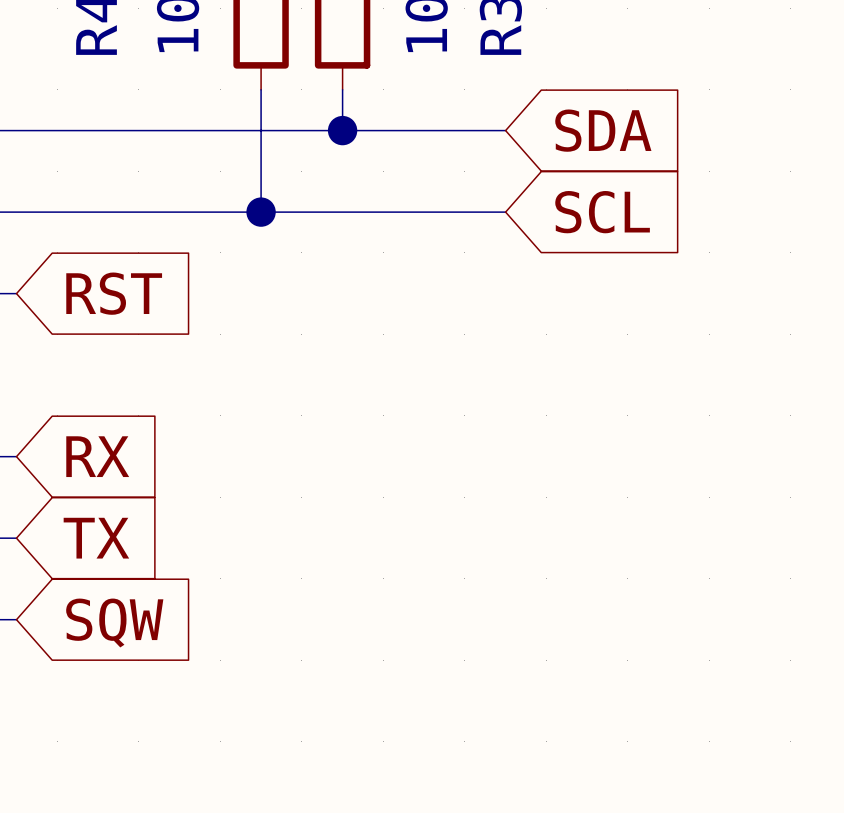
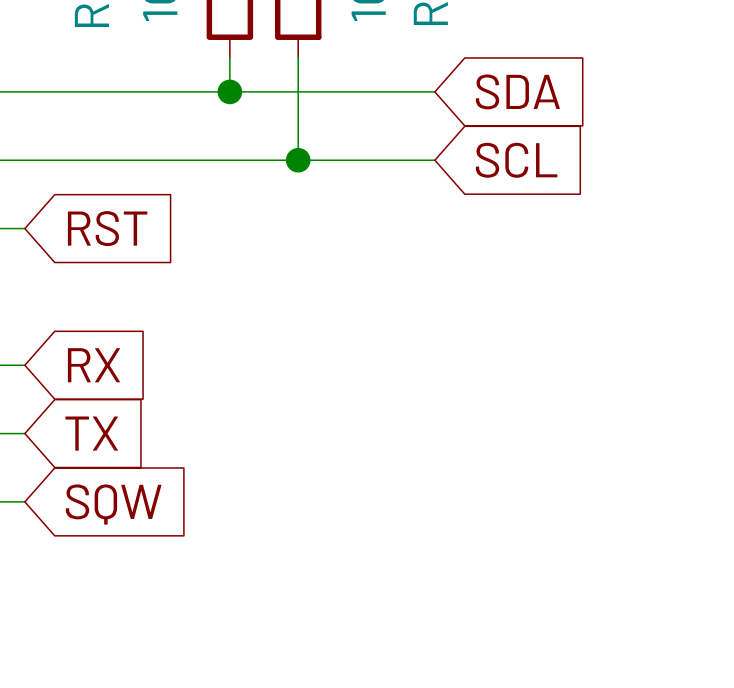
wire: (261, 130) (261, 212) -> (298, 91) (298, 160)
junction: none -> (229, 91)
junction: (342, 130) -> none
junction: (261, 212) -> none
junction: none -> (298, 160)

